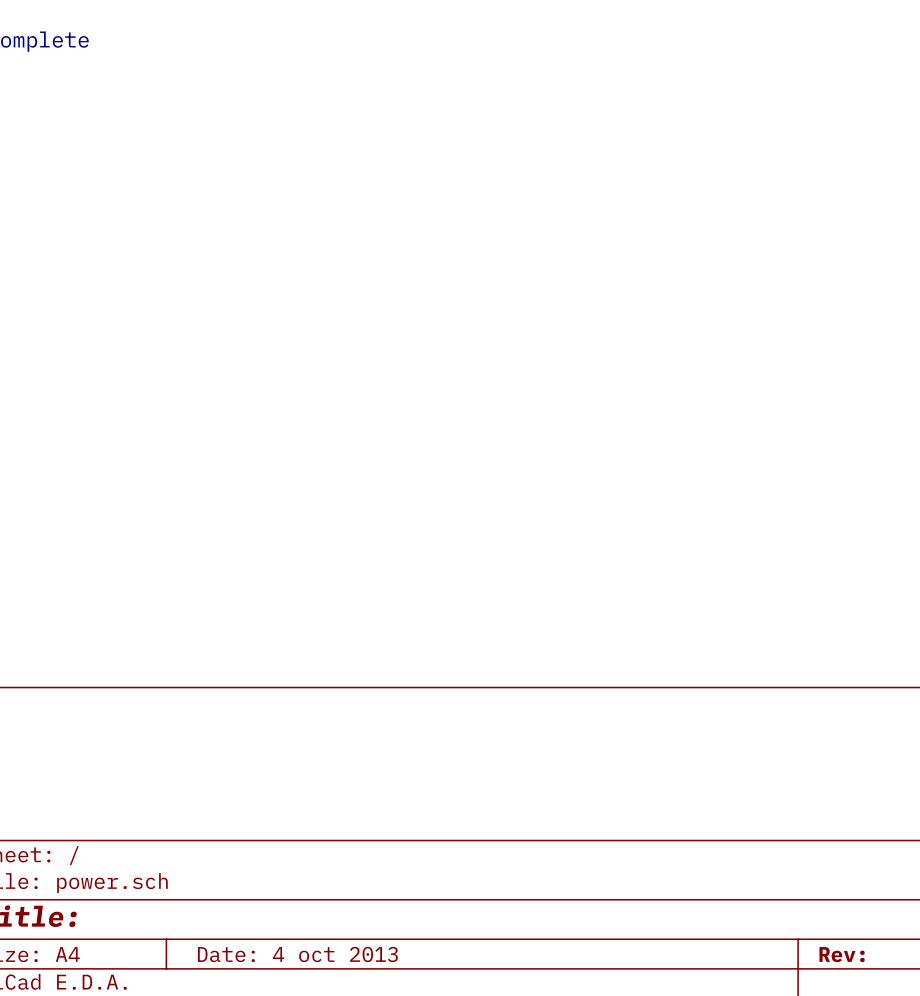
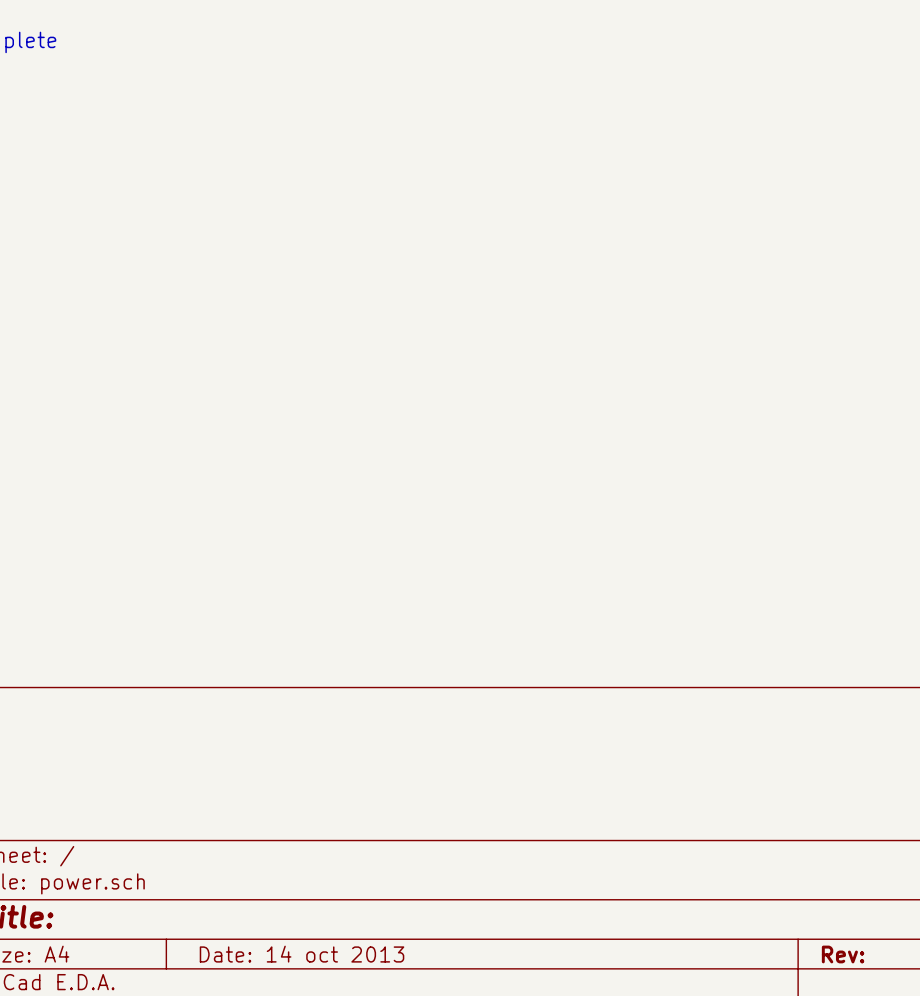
title block: Date: 4 oct 2013 (297, 954) -> Date: 14 oct 2013 (302, 954)

